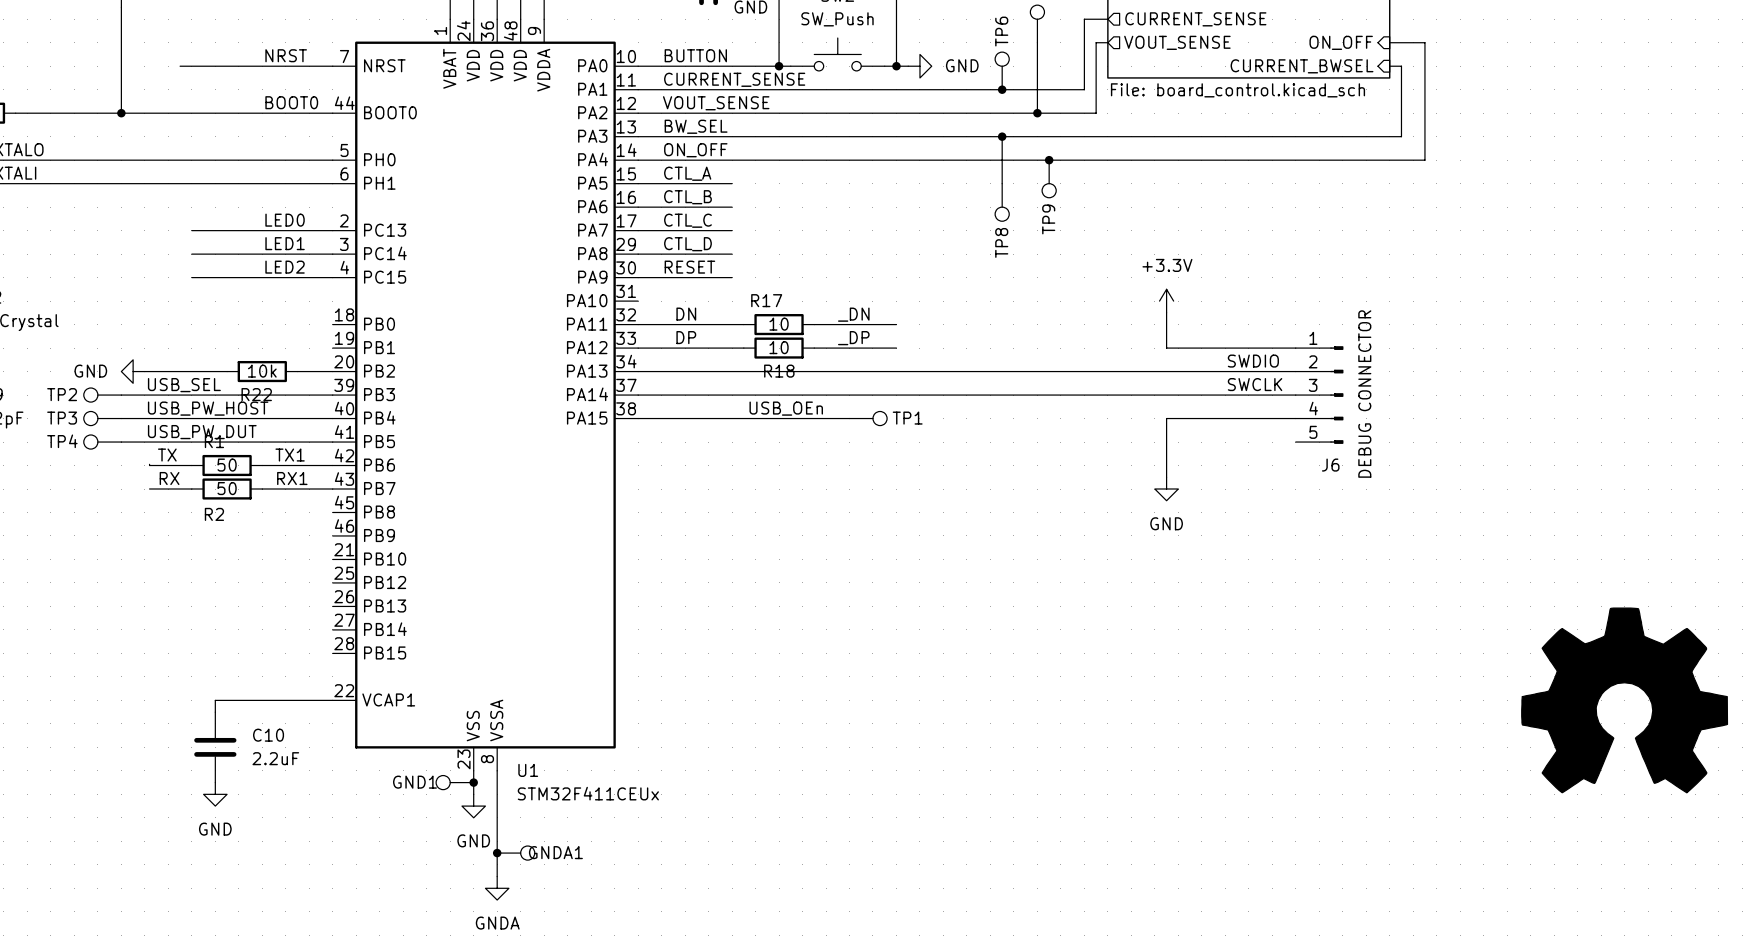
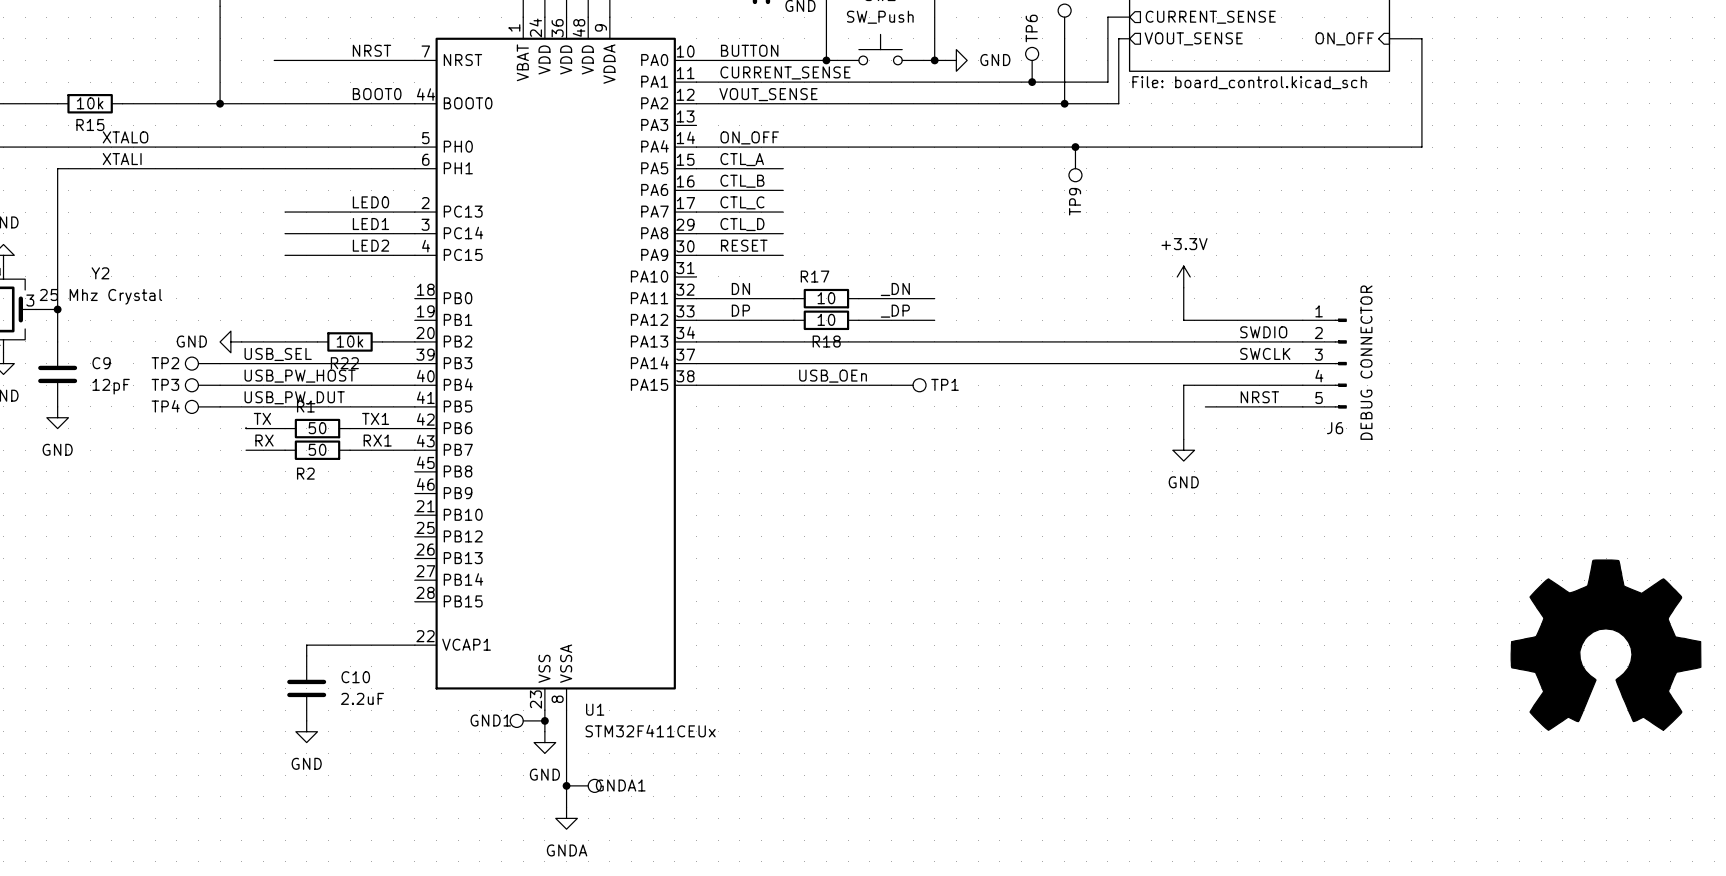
sheet pin: CURRENT_BWSEL (1302, 66) -> none
wire: (1389, 66) (1401, 66) (1401, 136) (638, 136) -> none
label: BW_SEL (696, 126) -> none
wire: (1002, 136) (1002, 183) -> none
junction: (1002, 136) -> none
TP8: (1002, 202) -> none
label: none -> NRST (1259, 397)
wire: none -> (1205, 406) (1302, 406)

